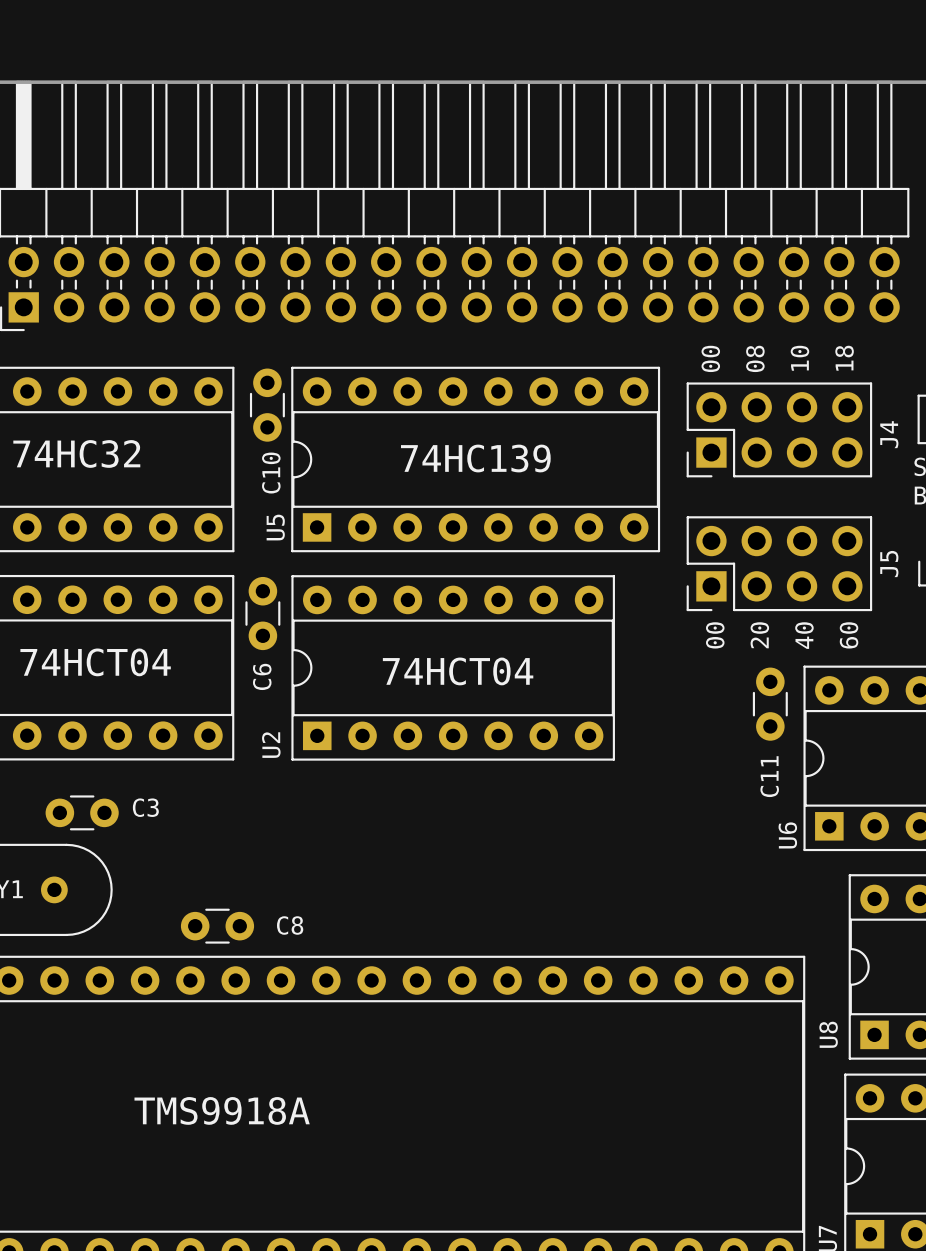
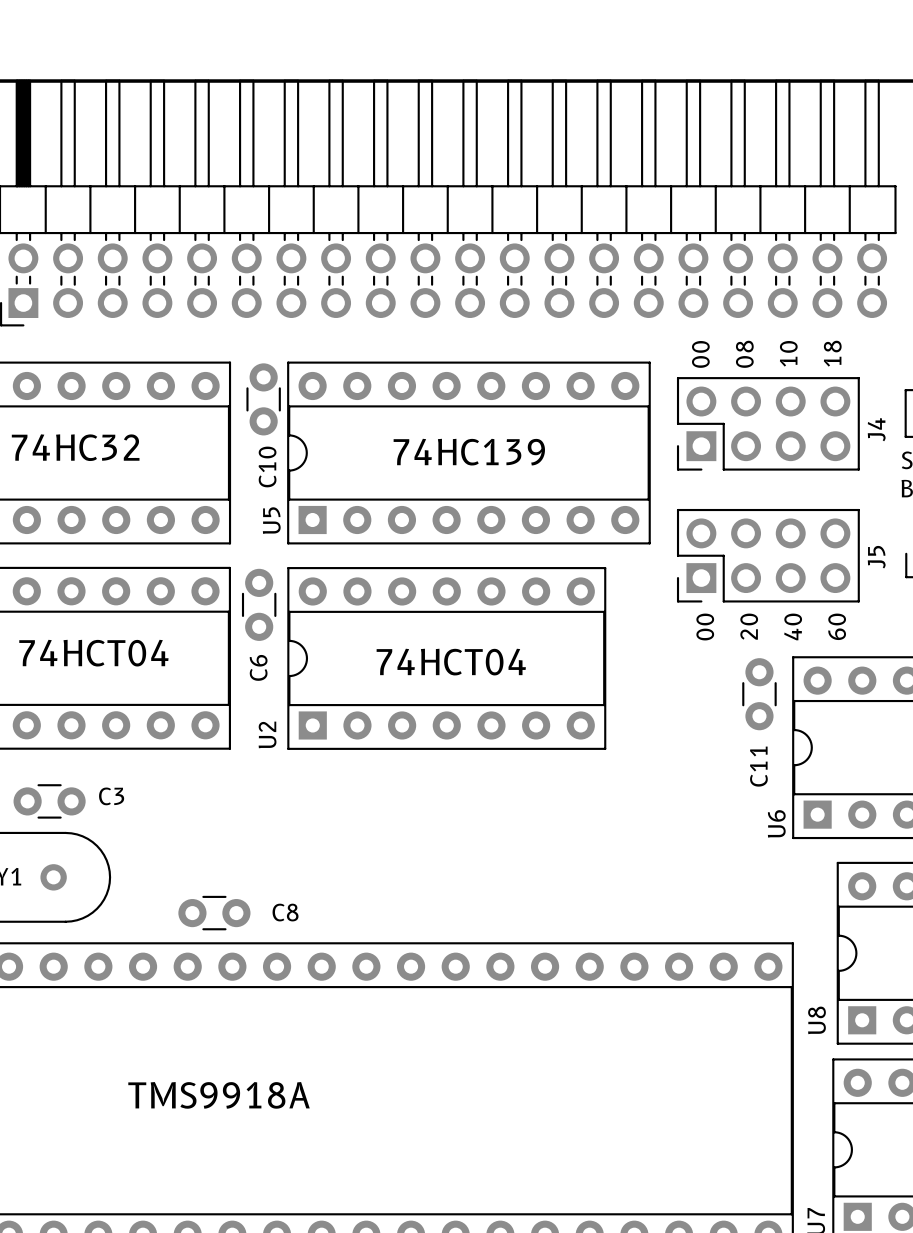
C3 position: (82, 812) -> (49, 801)

